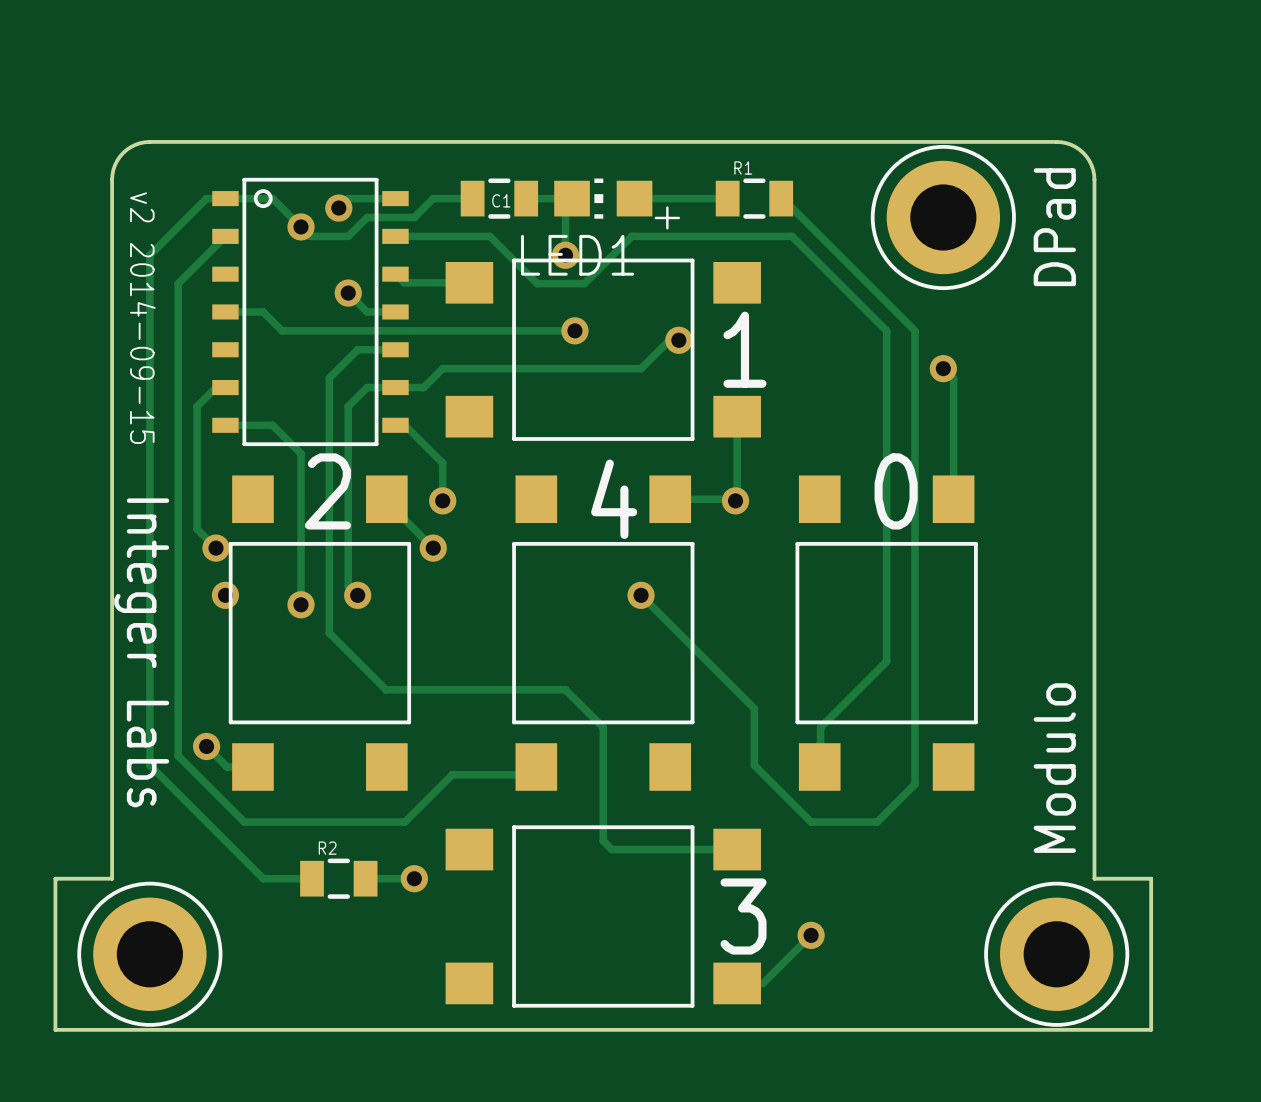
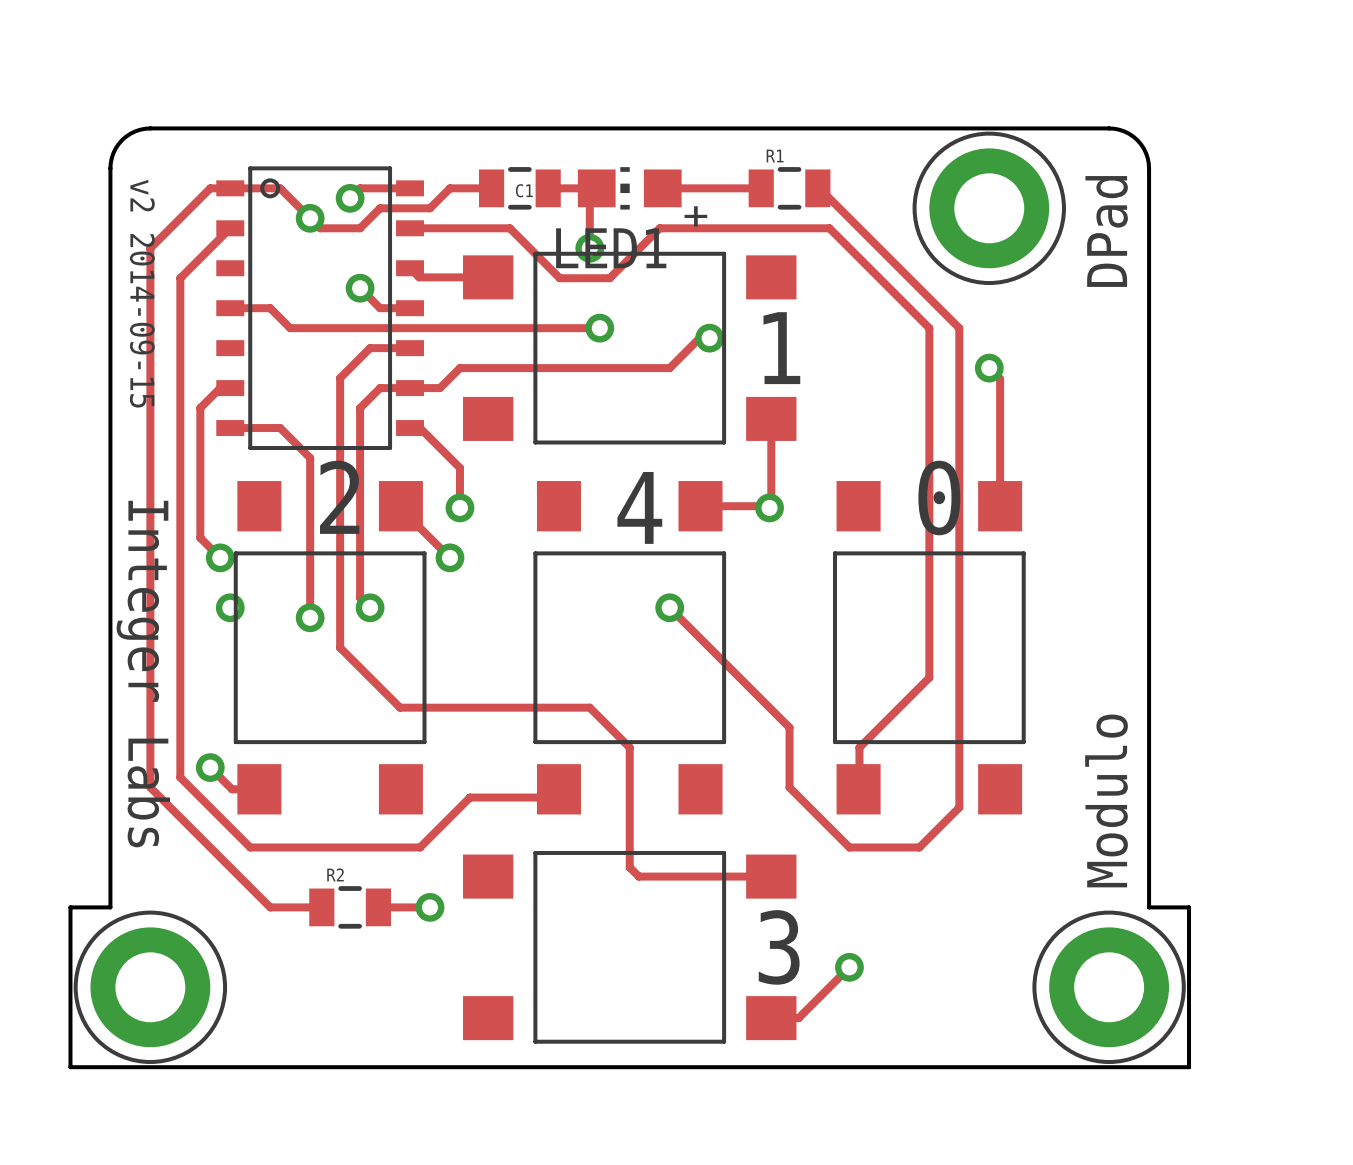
part footprint: [53, 140, 1154, 1032] -> [68, 126, 1192, 1070]

